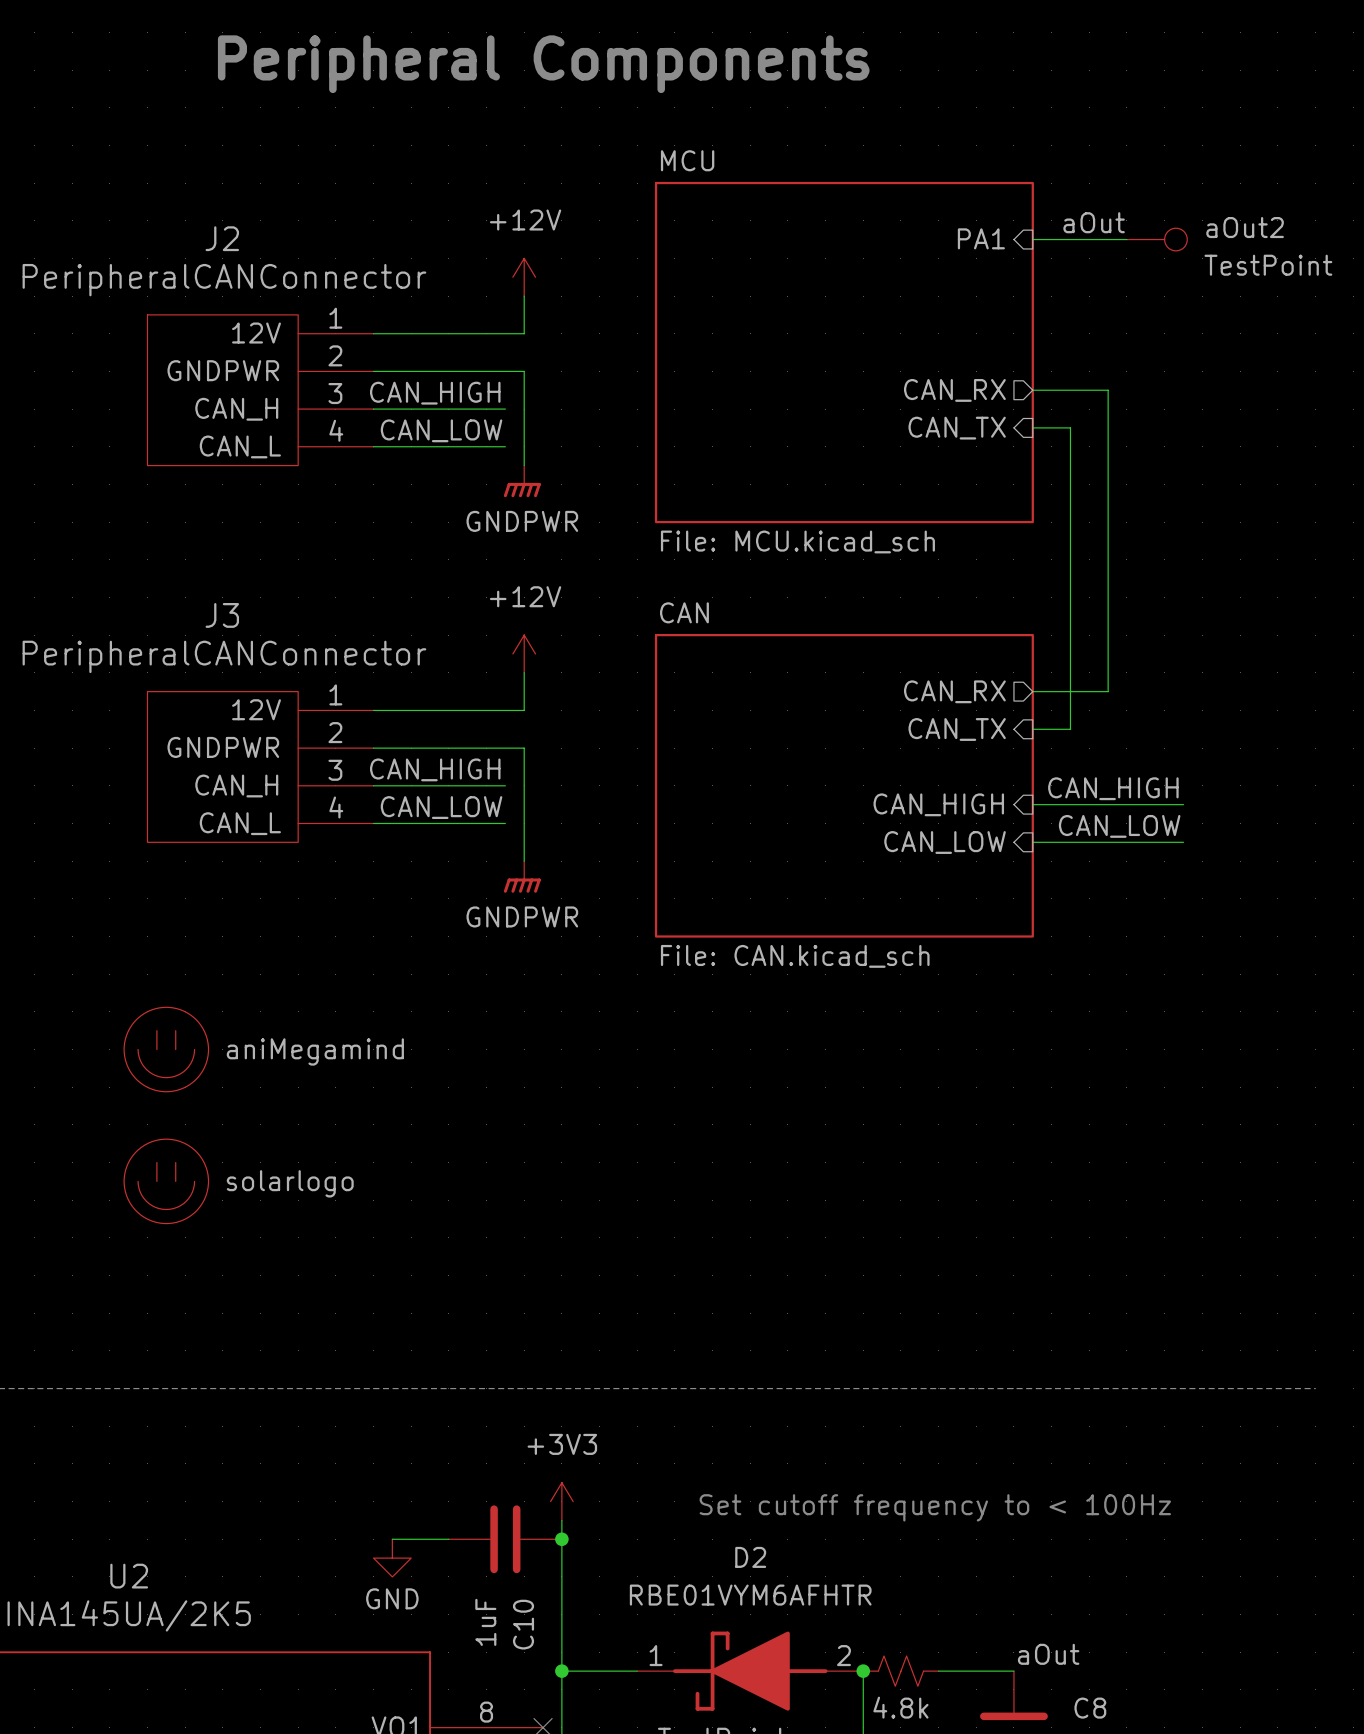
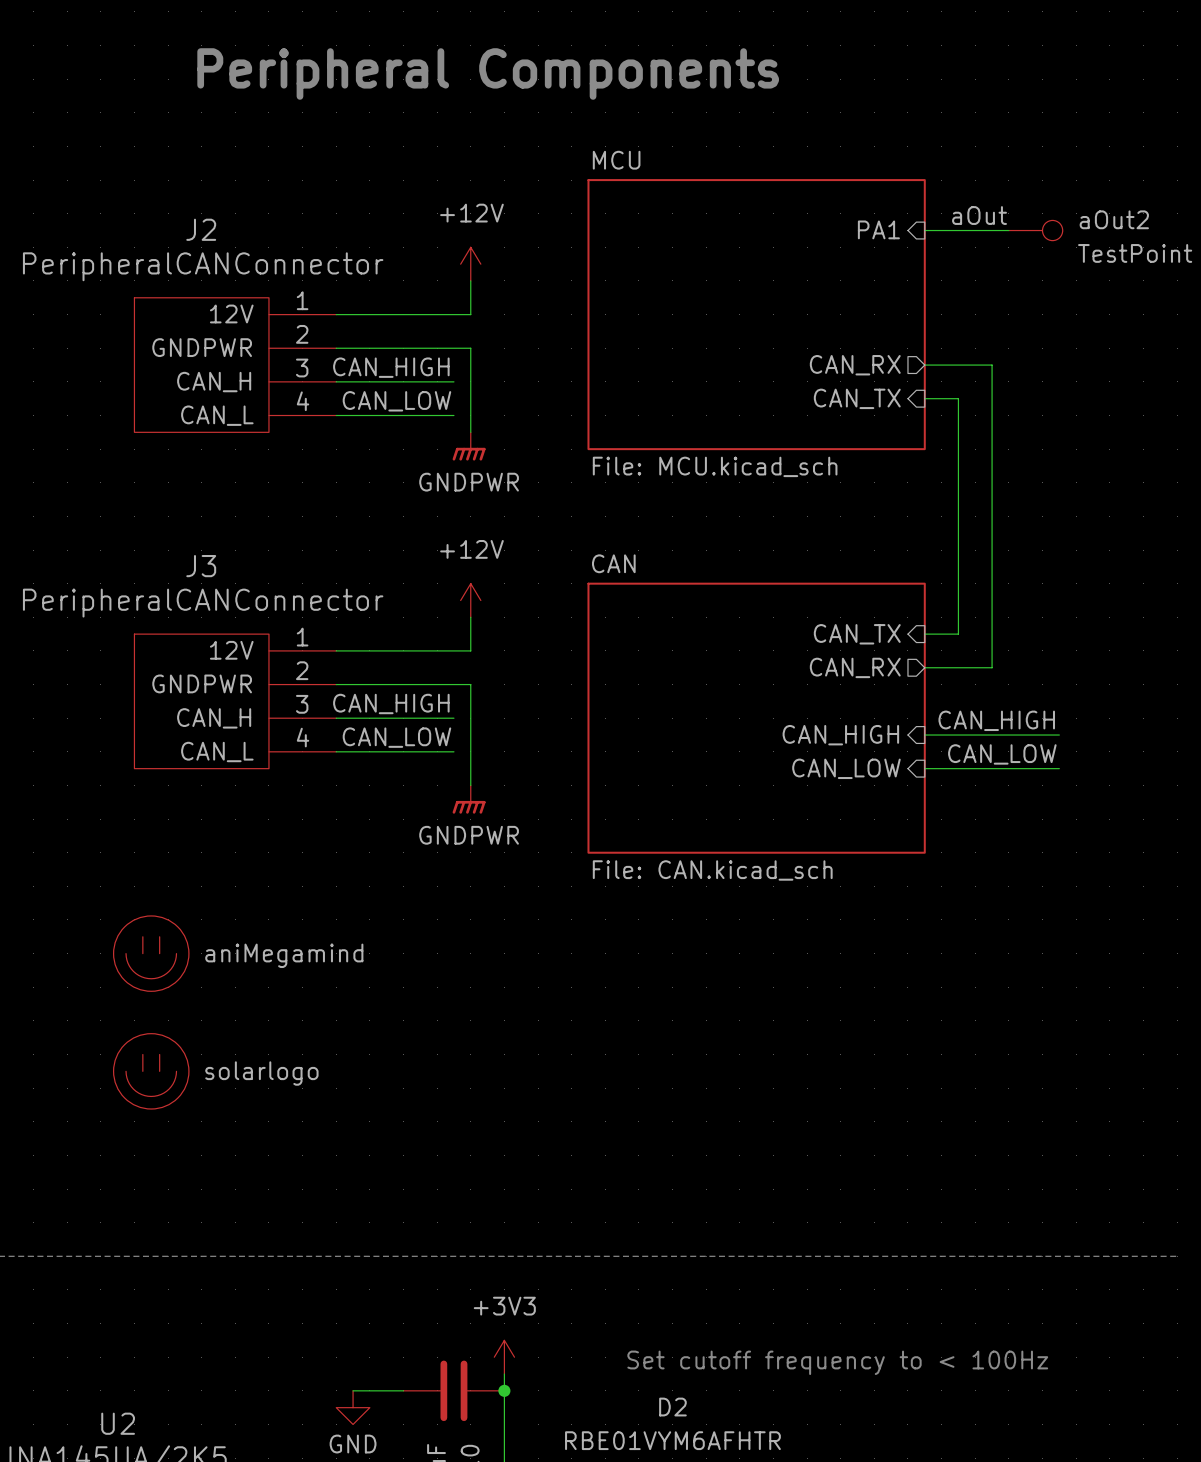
sheet MCU: none -> File: MCU.kicad_sch (756, 314)
sheet MCU: File: MCU.kicad_sch (844, 352) -> none
sheet pin shape: output (954, 691) -> input (857, 634)
sheet pin: CAN_RX (954, 691) -> CAN_TX (857, 634)
wire: (1108, 691) (1070, 691) (1070, 729) -> (992, 634) (992, 667) (958, 667)
sheet pin shape: input (957, 729) -> output (855, 667)
sheet pin: CAN_TX (957, 729) -> CAN_RX (855, 667)

